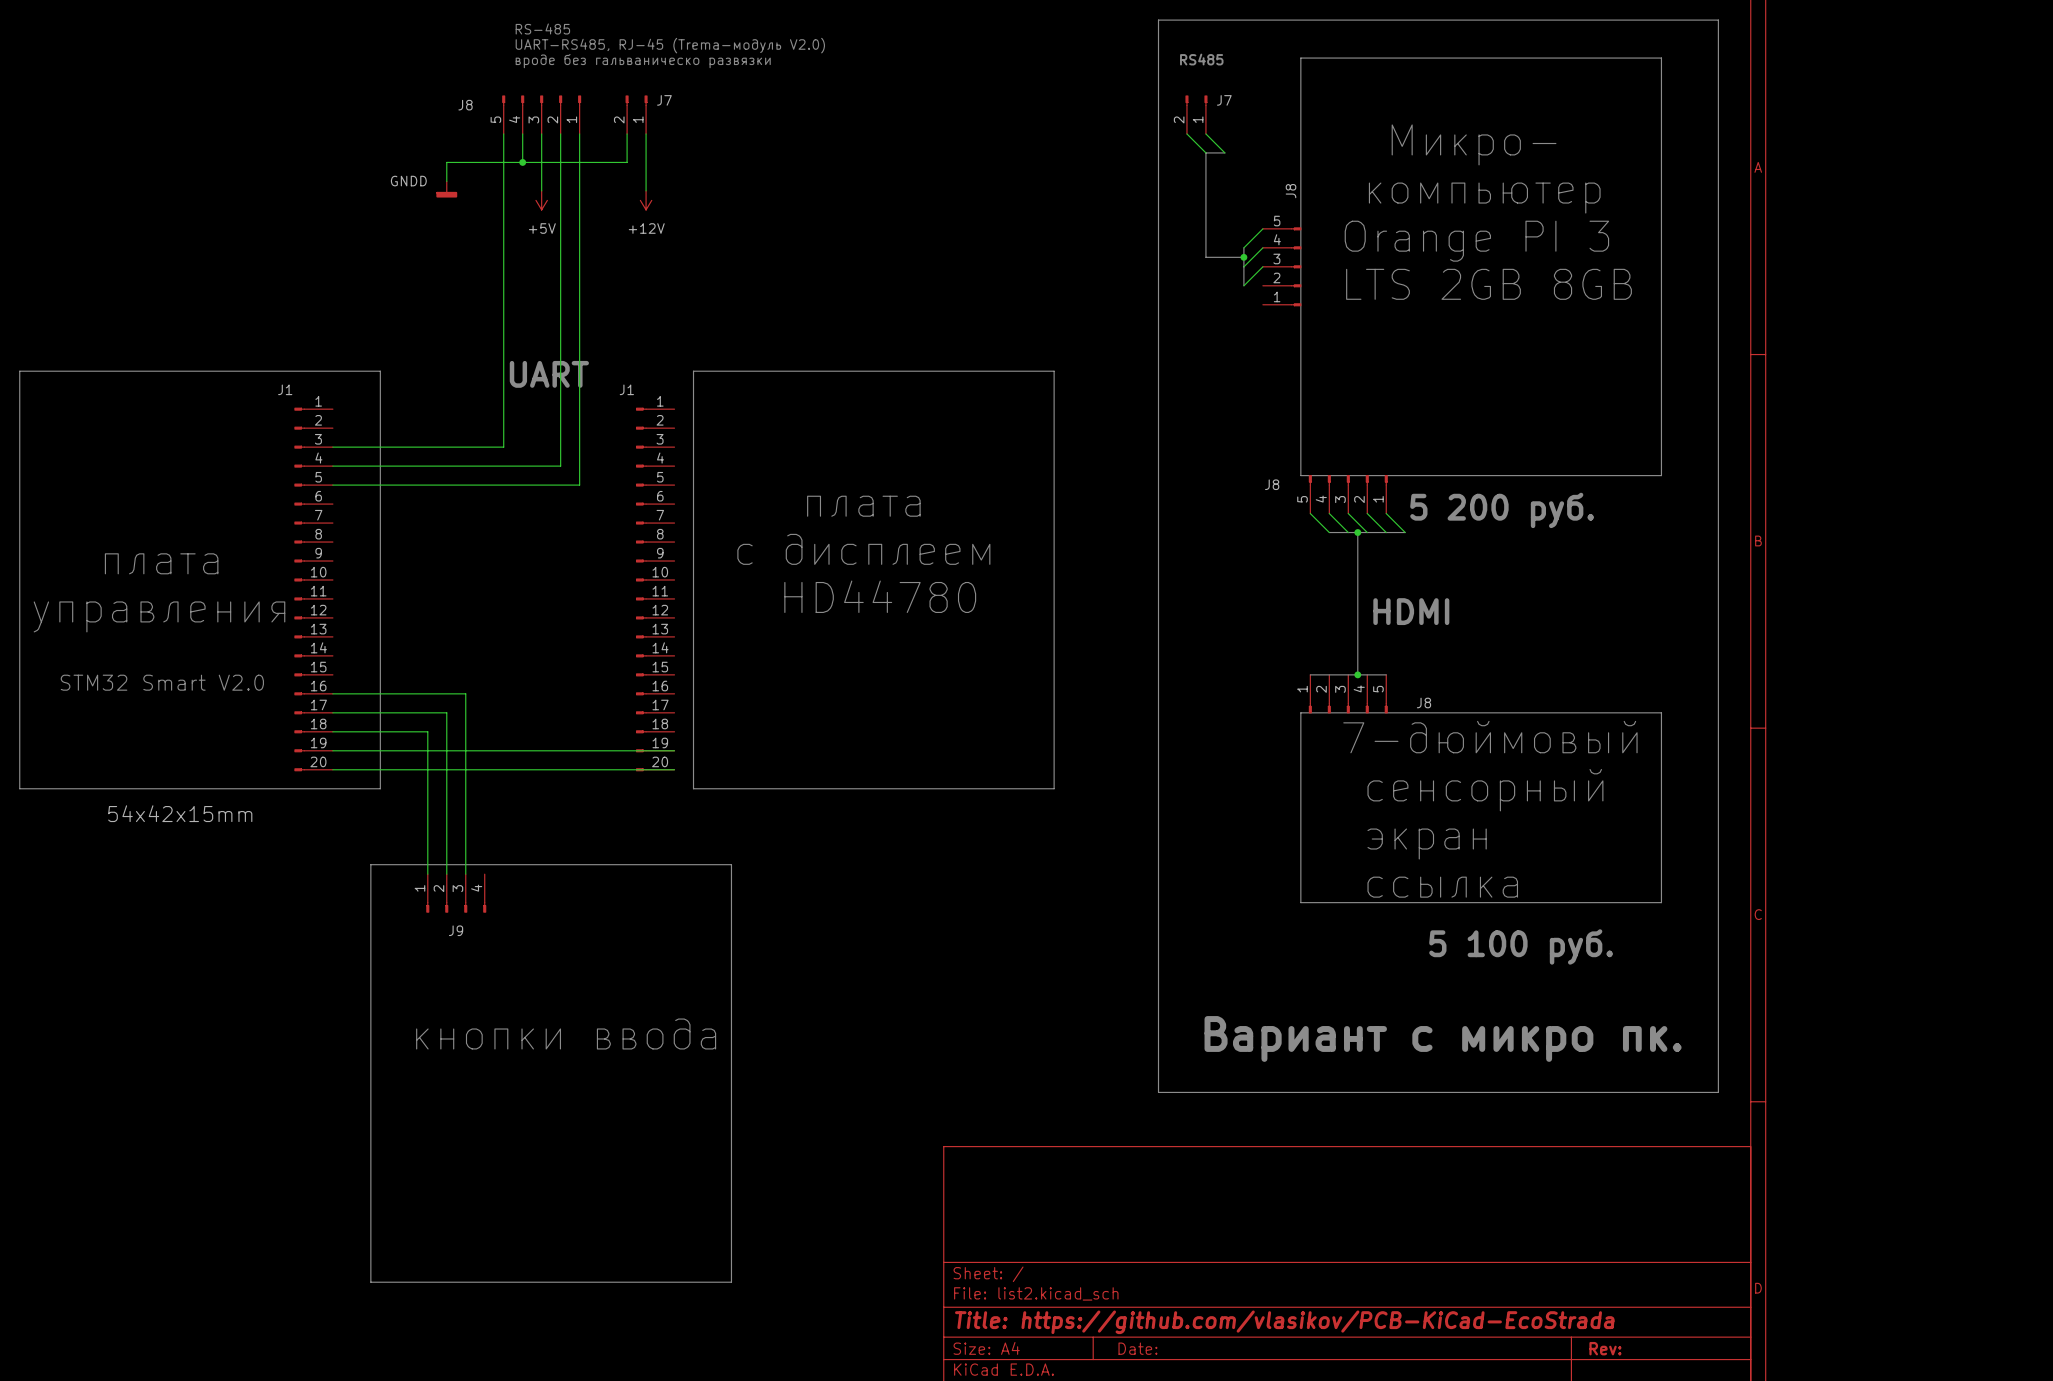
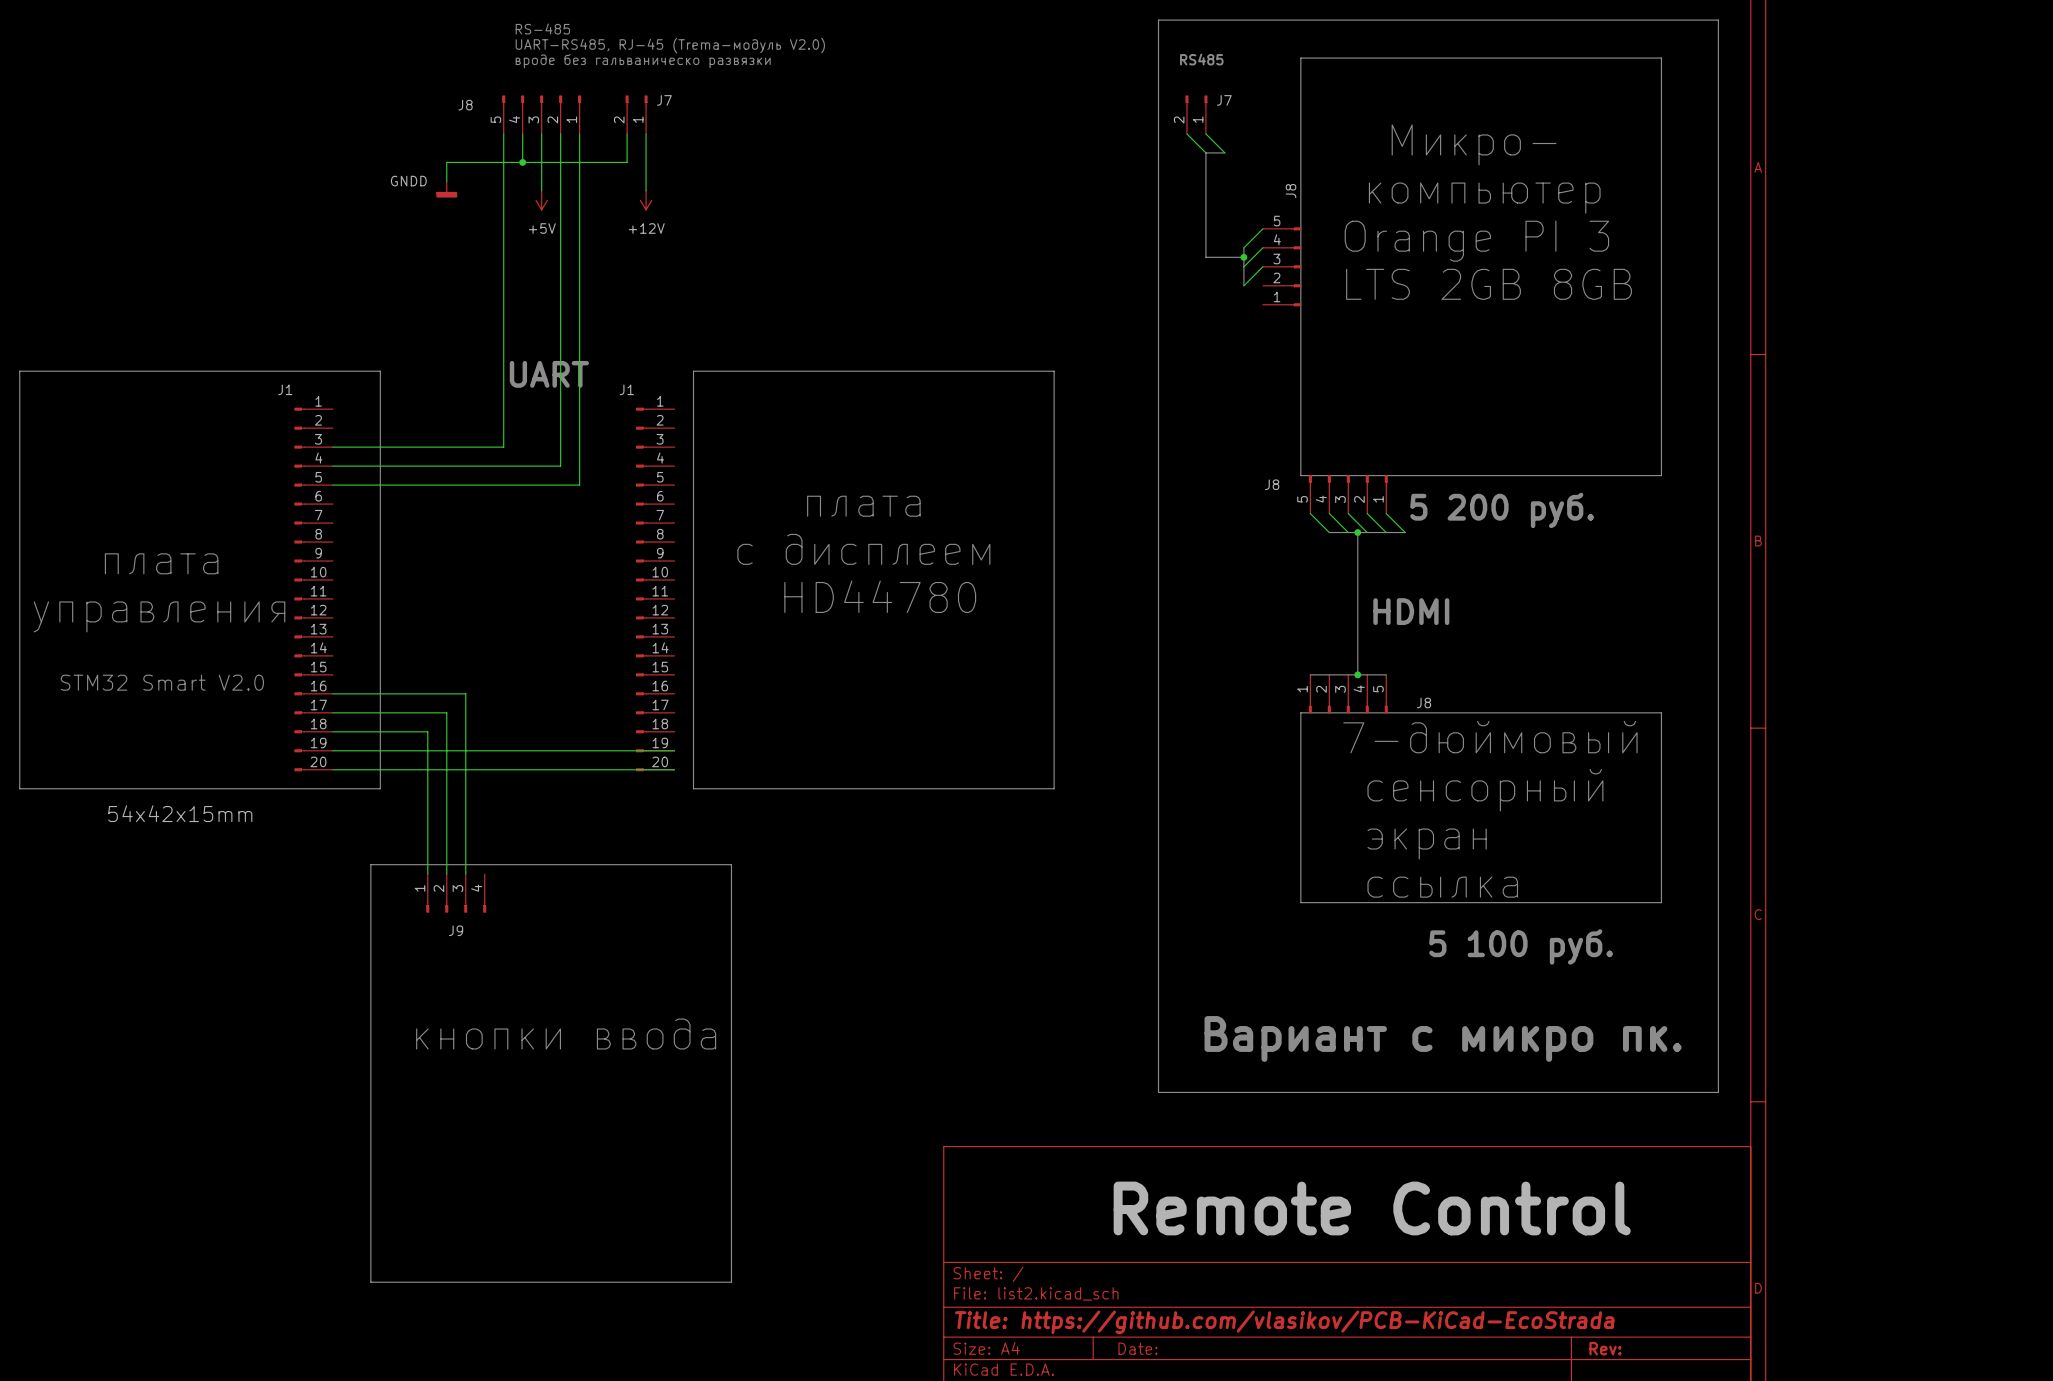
label: none -> Remote Control (1372, 1208)

